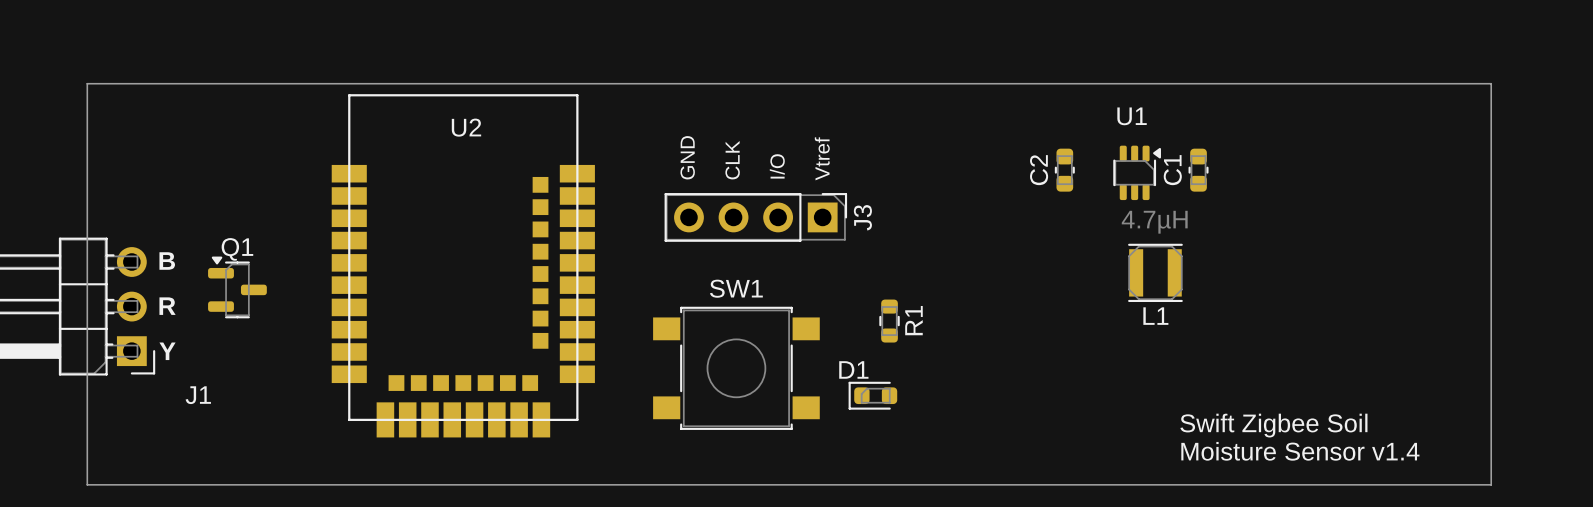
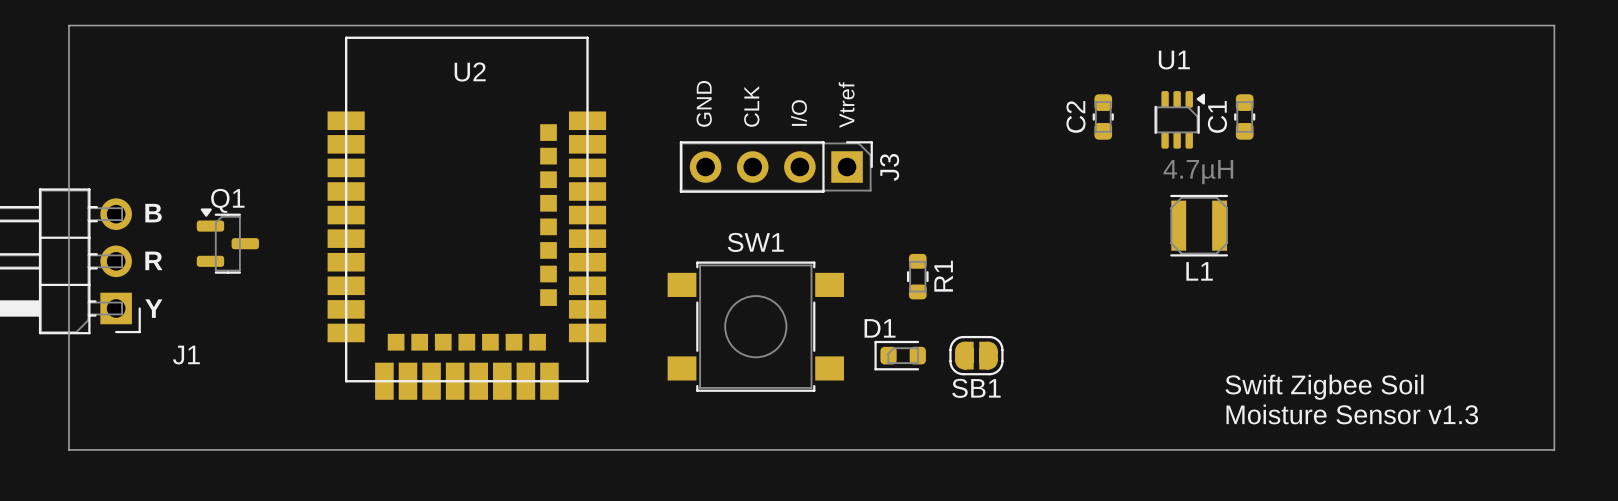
SB1: none -> (976, 355)
text: Moisture Sensor v1.4 (1300, 451) -> Moisture Sensor v1.3 (1352, 414)

